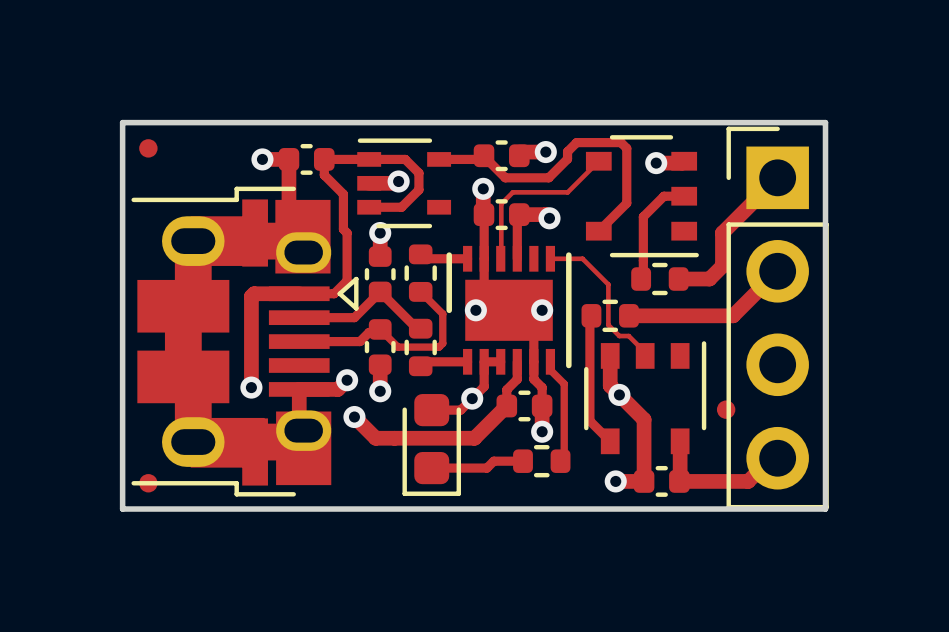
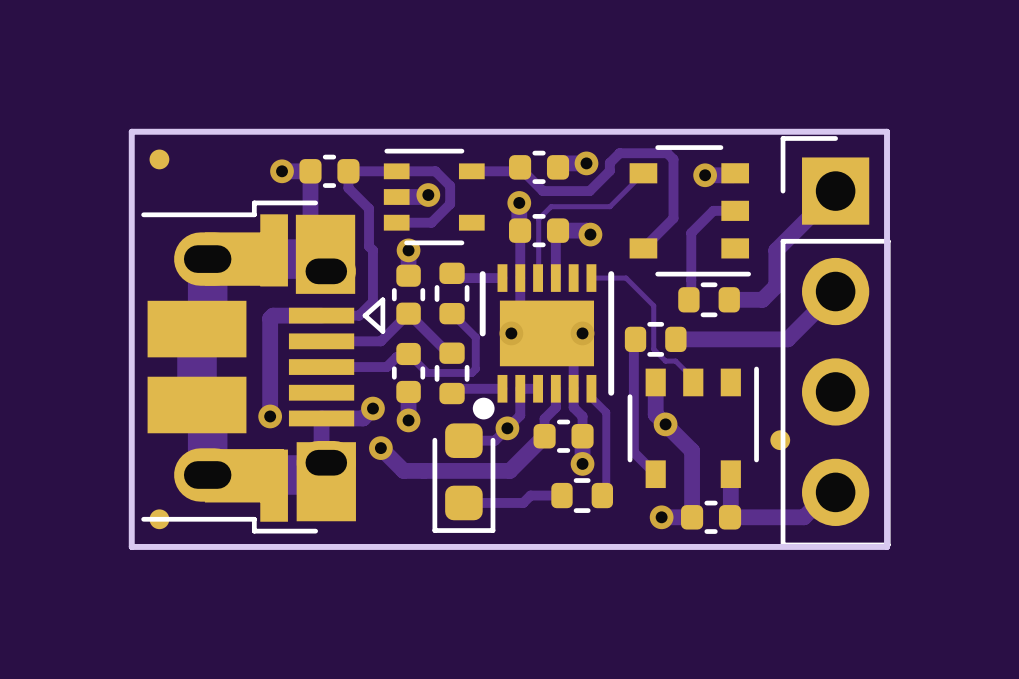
drawing: none -> [472, 397, 495, 420]

